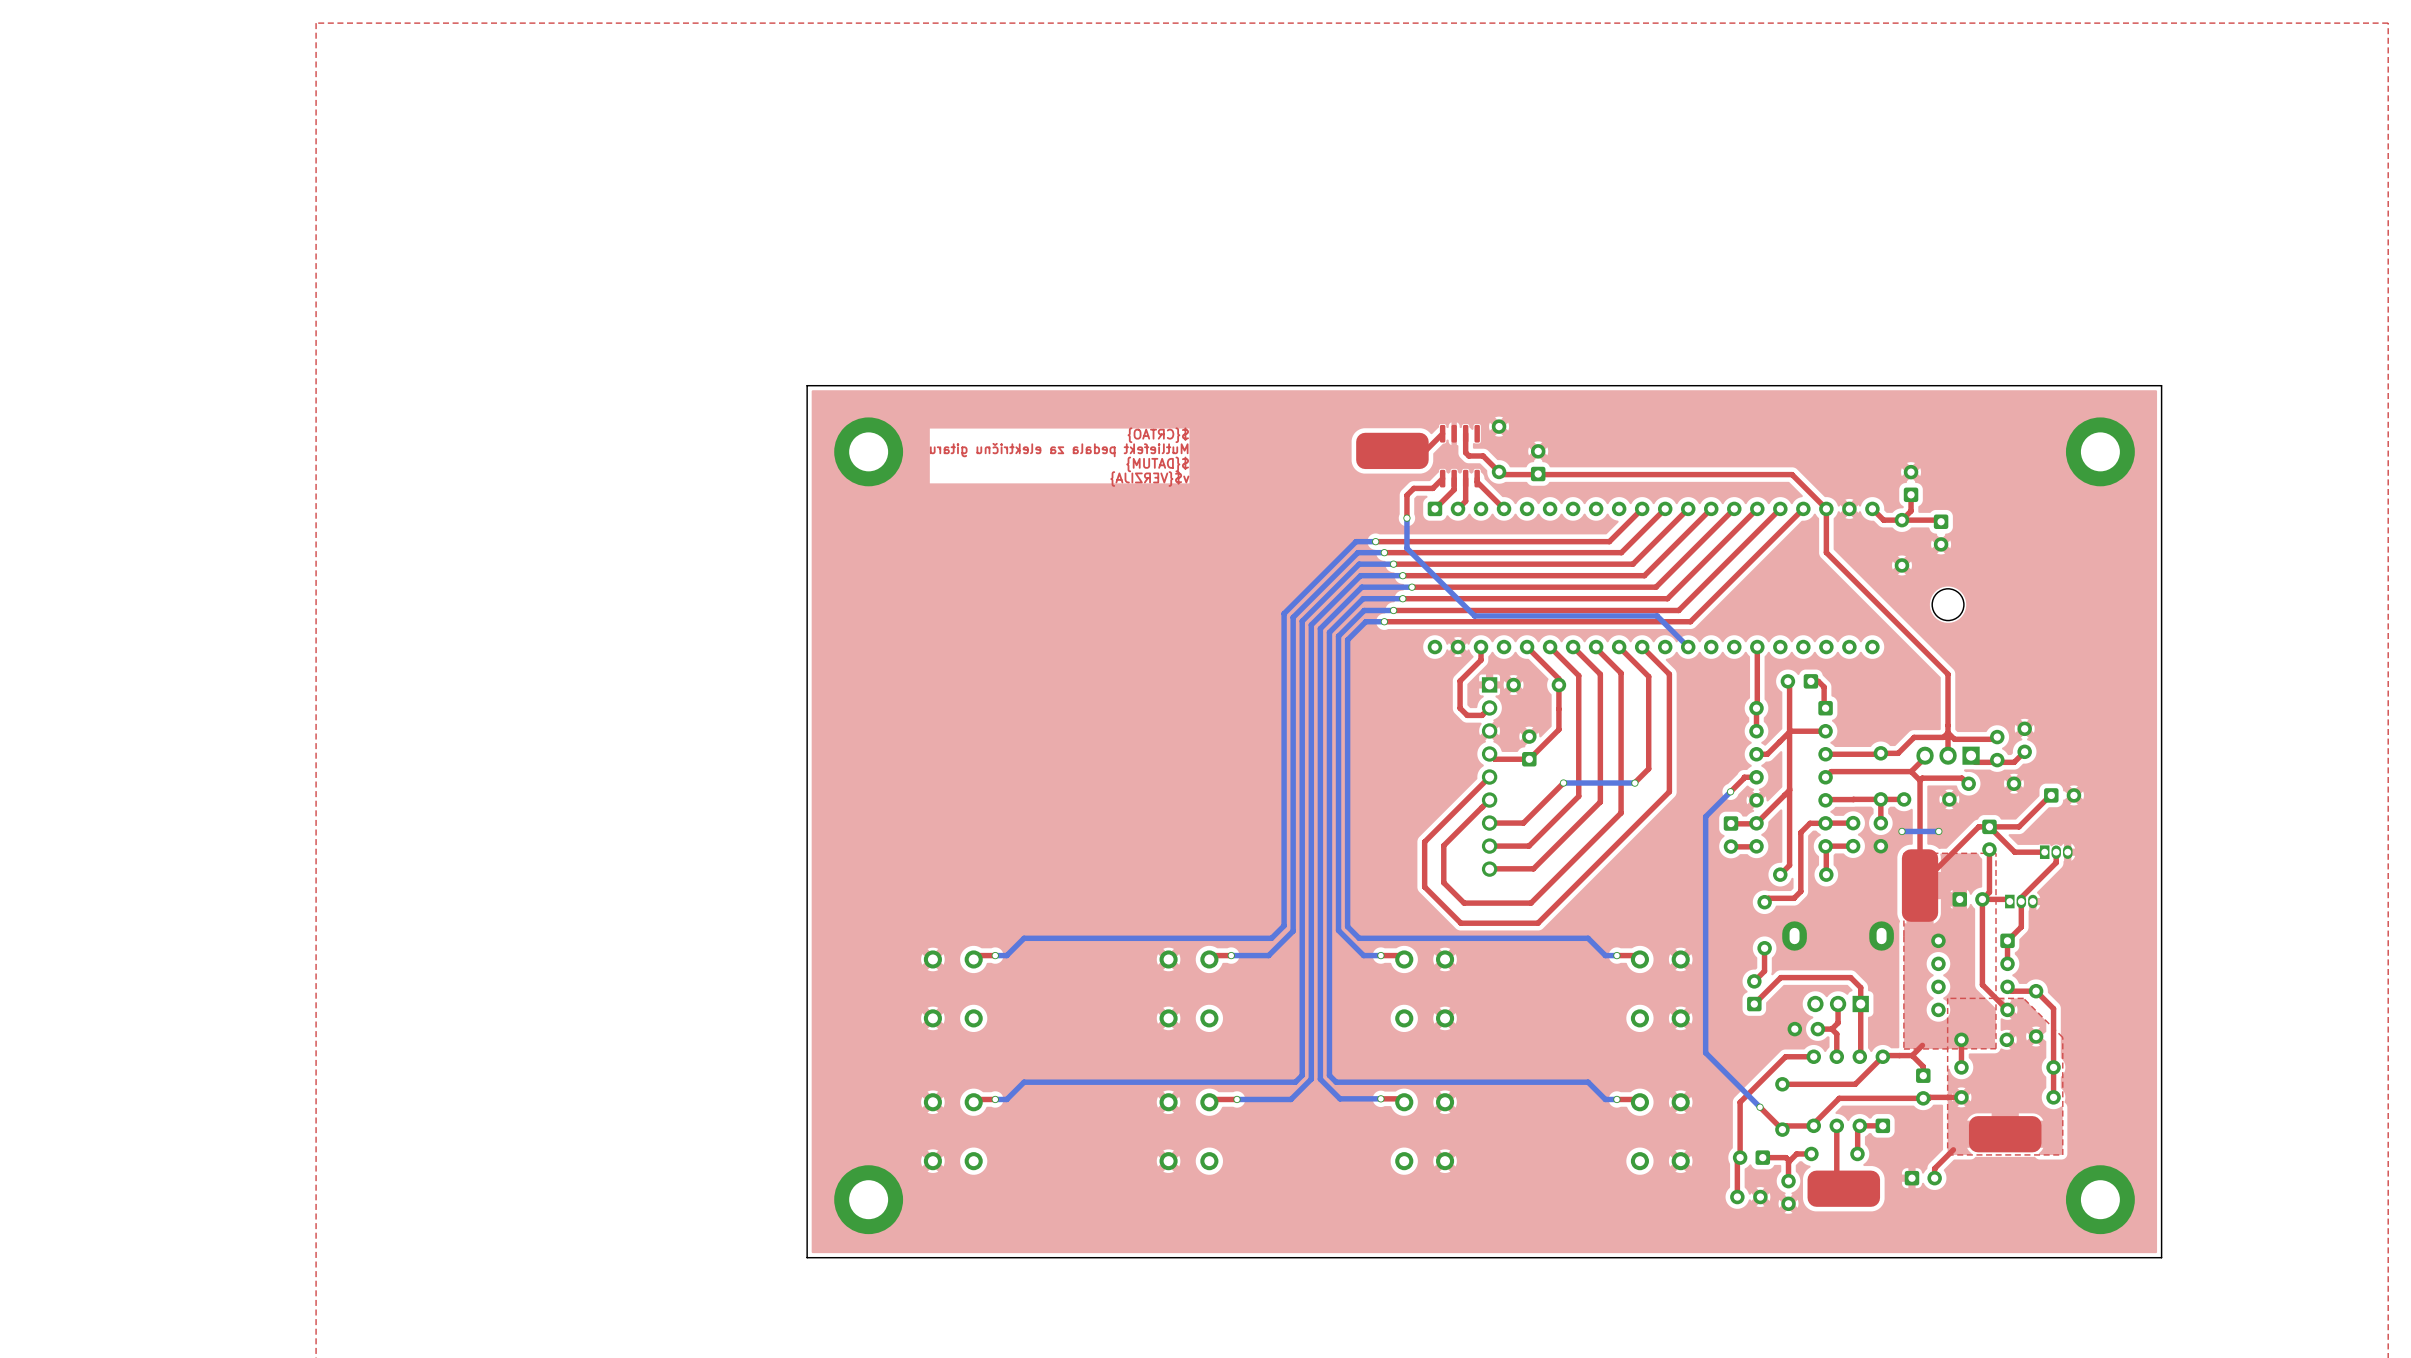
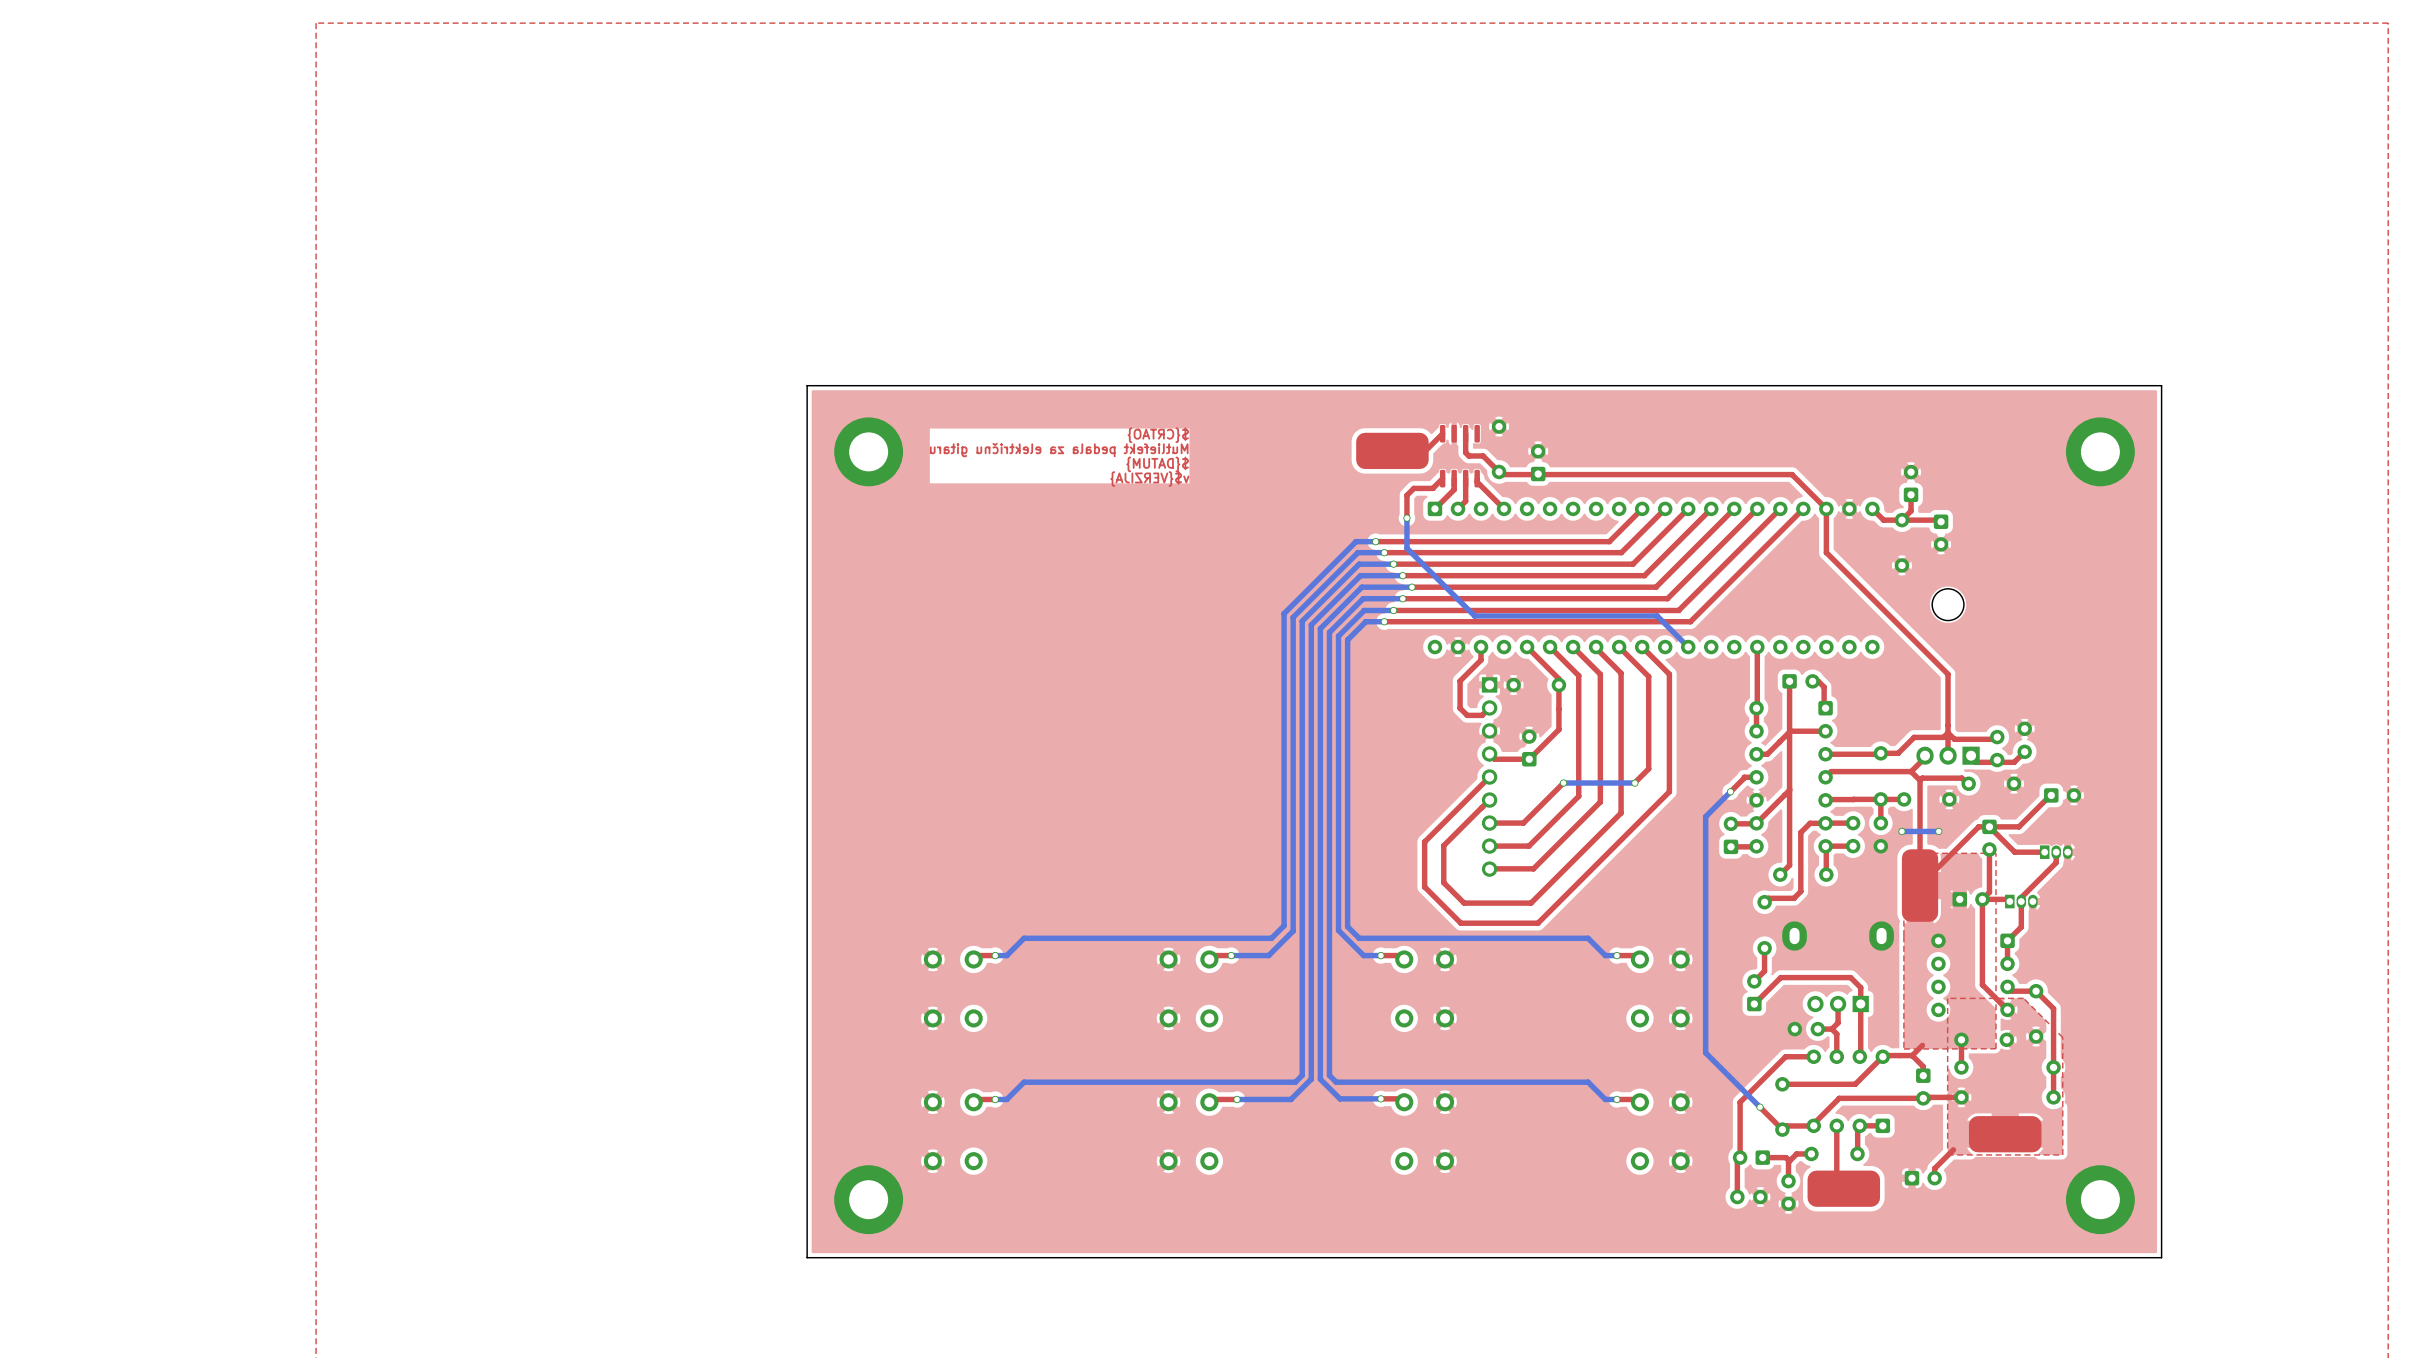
part rotation: 0° (1799, 681) -> 180° (1801, 681)
part rotation: 0° (1730, 835) -> 180° (1730, 835)

